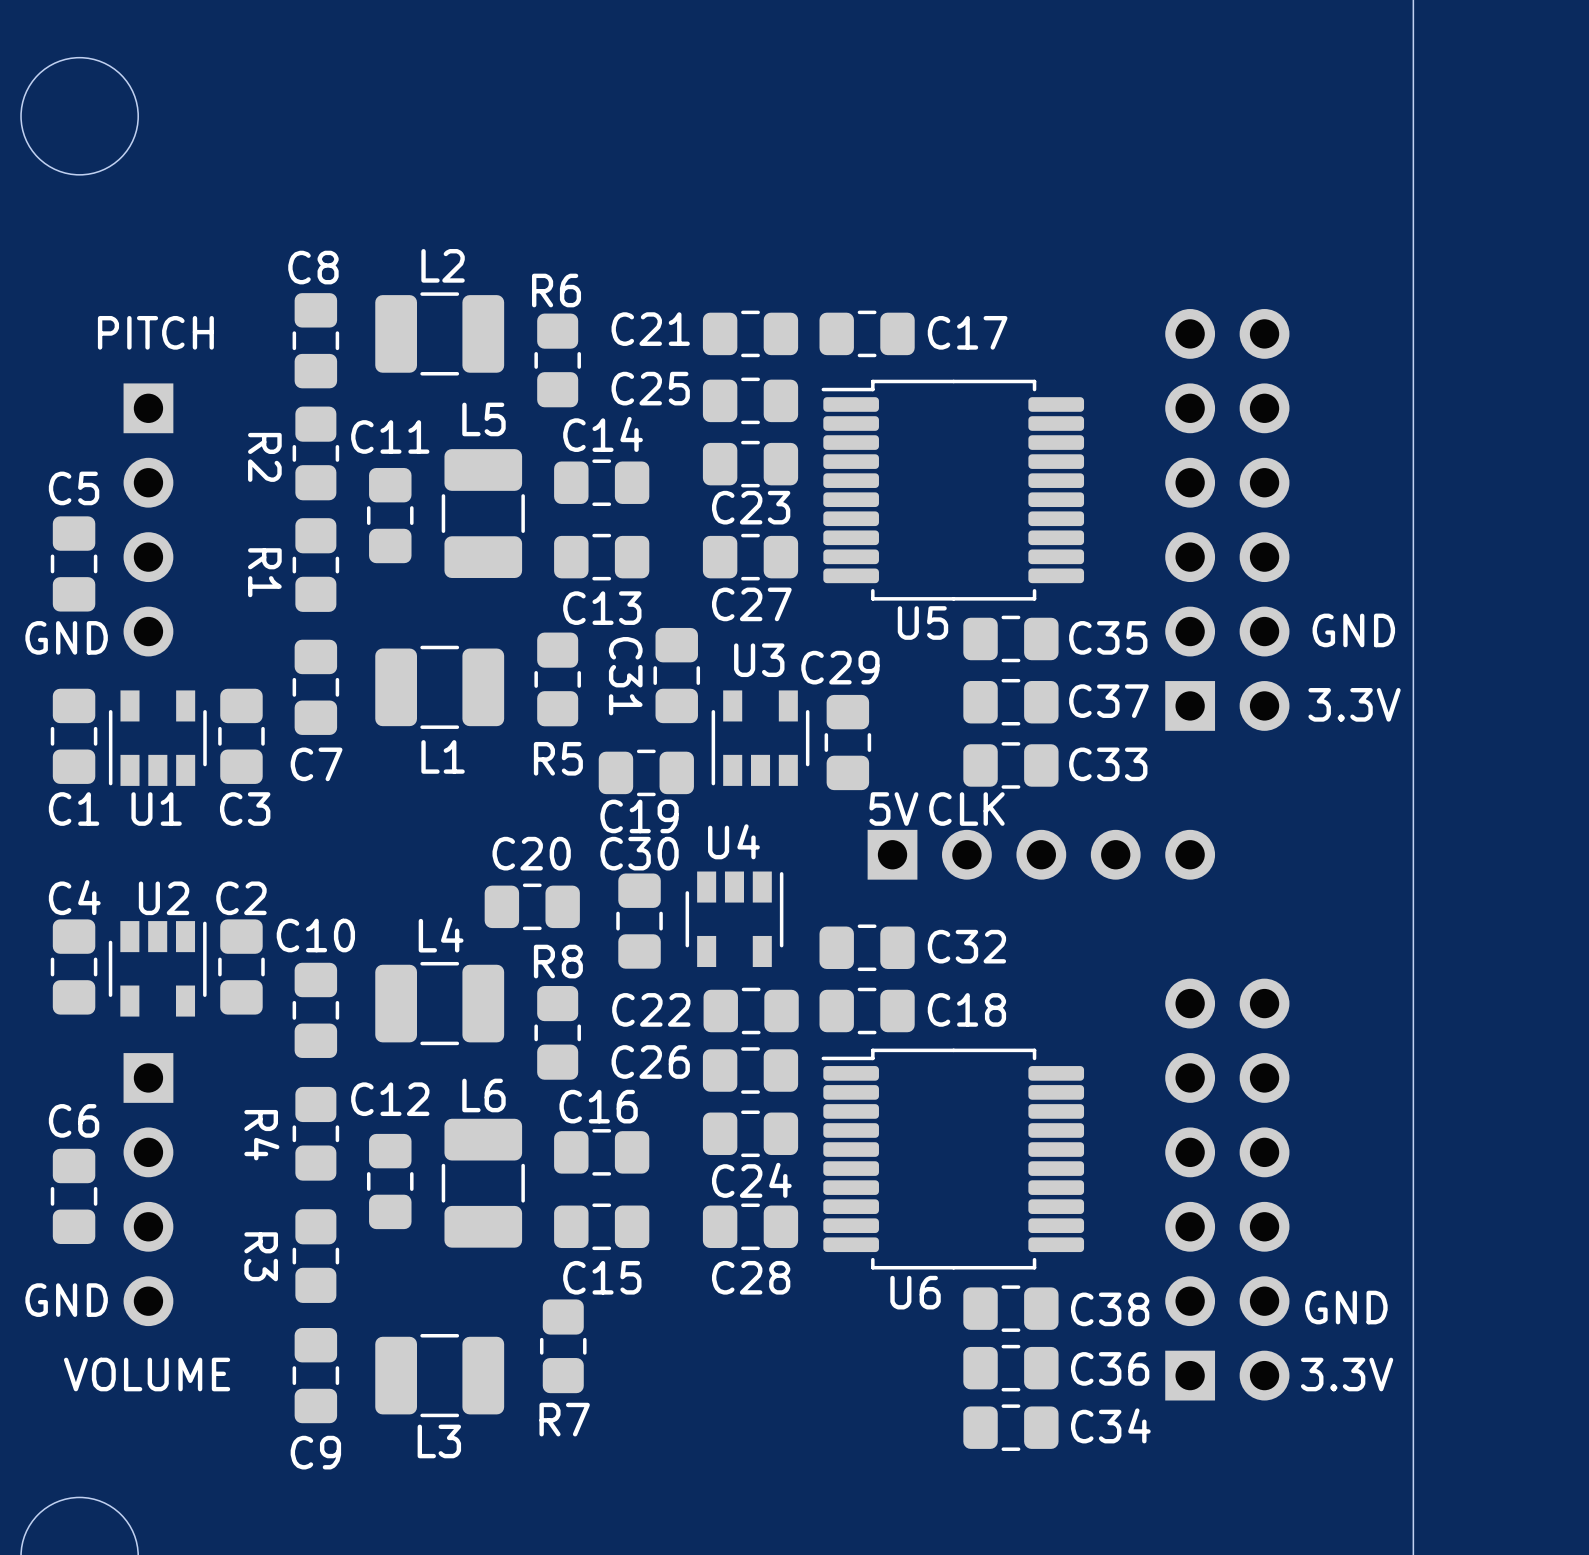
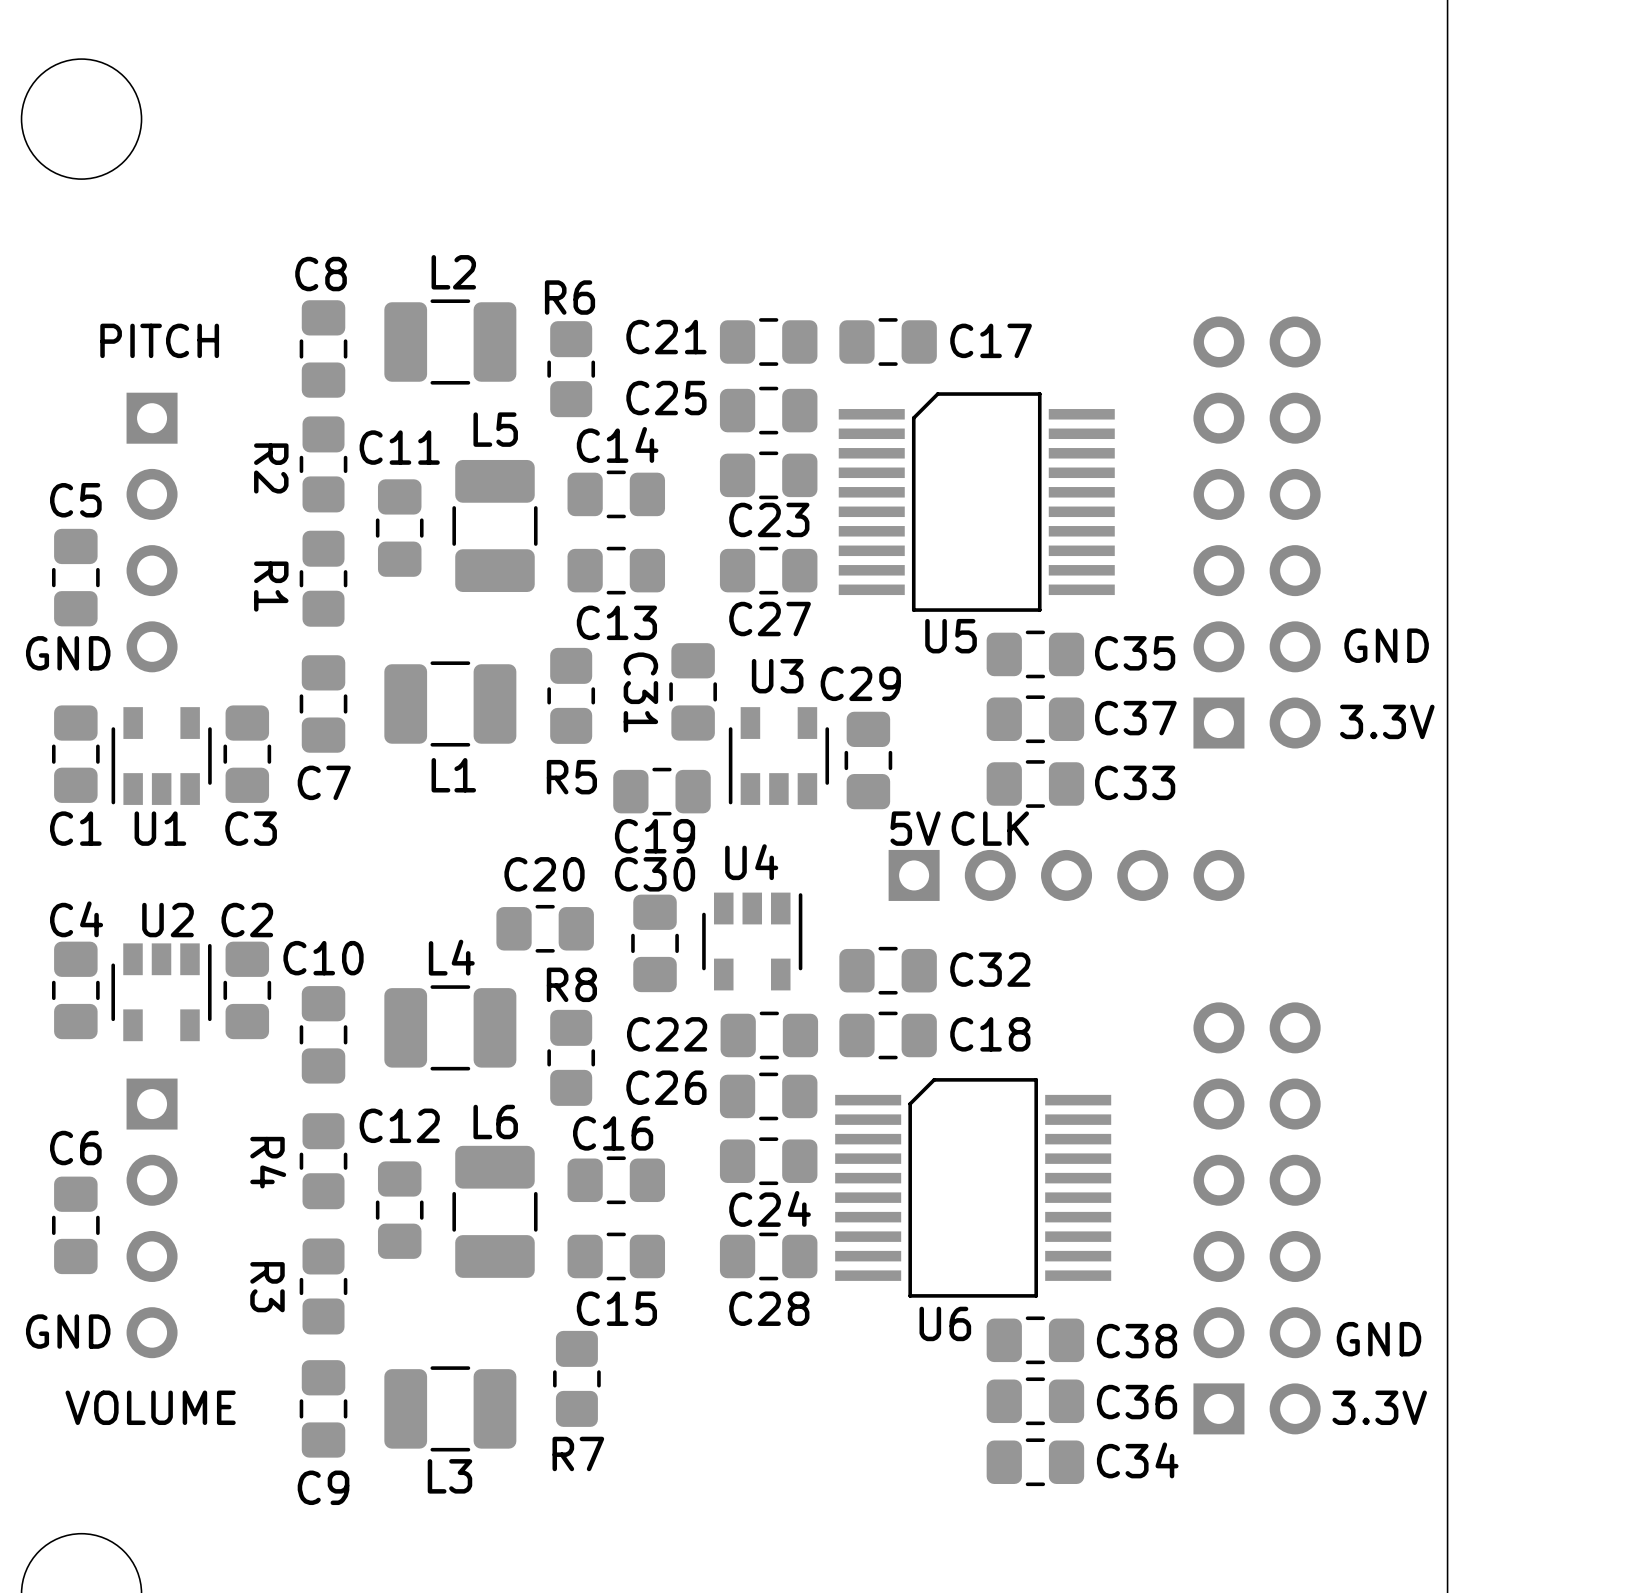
U5 footprint: [821, 379, 1085, 601] -> [838, 392, 1115, 612]
U6 footprint: [821, 1048, 1085, 1270] -> [835, 1078, 1112, 1298]

